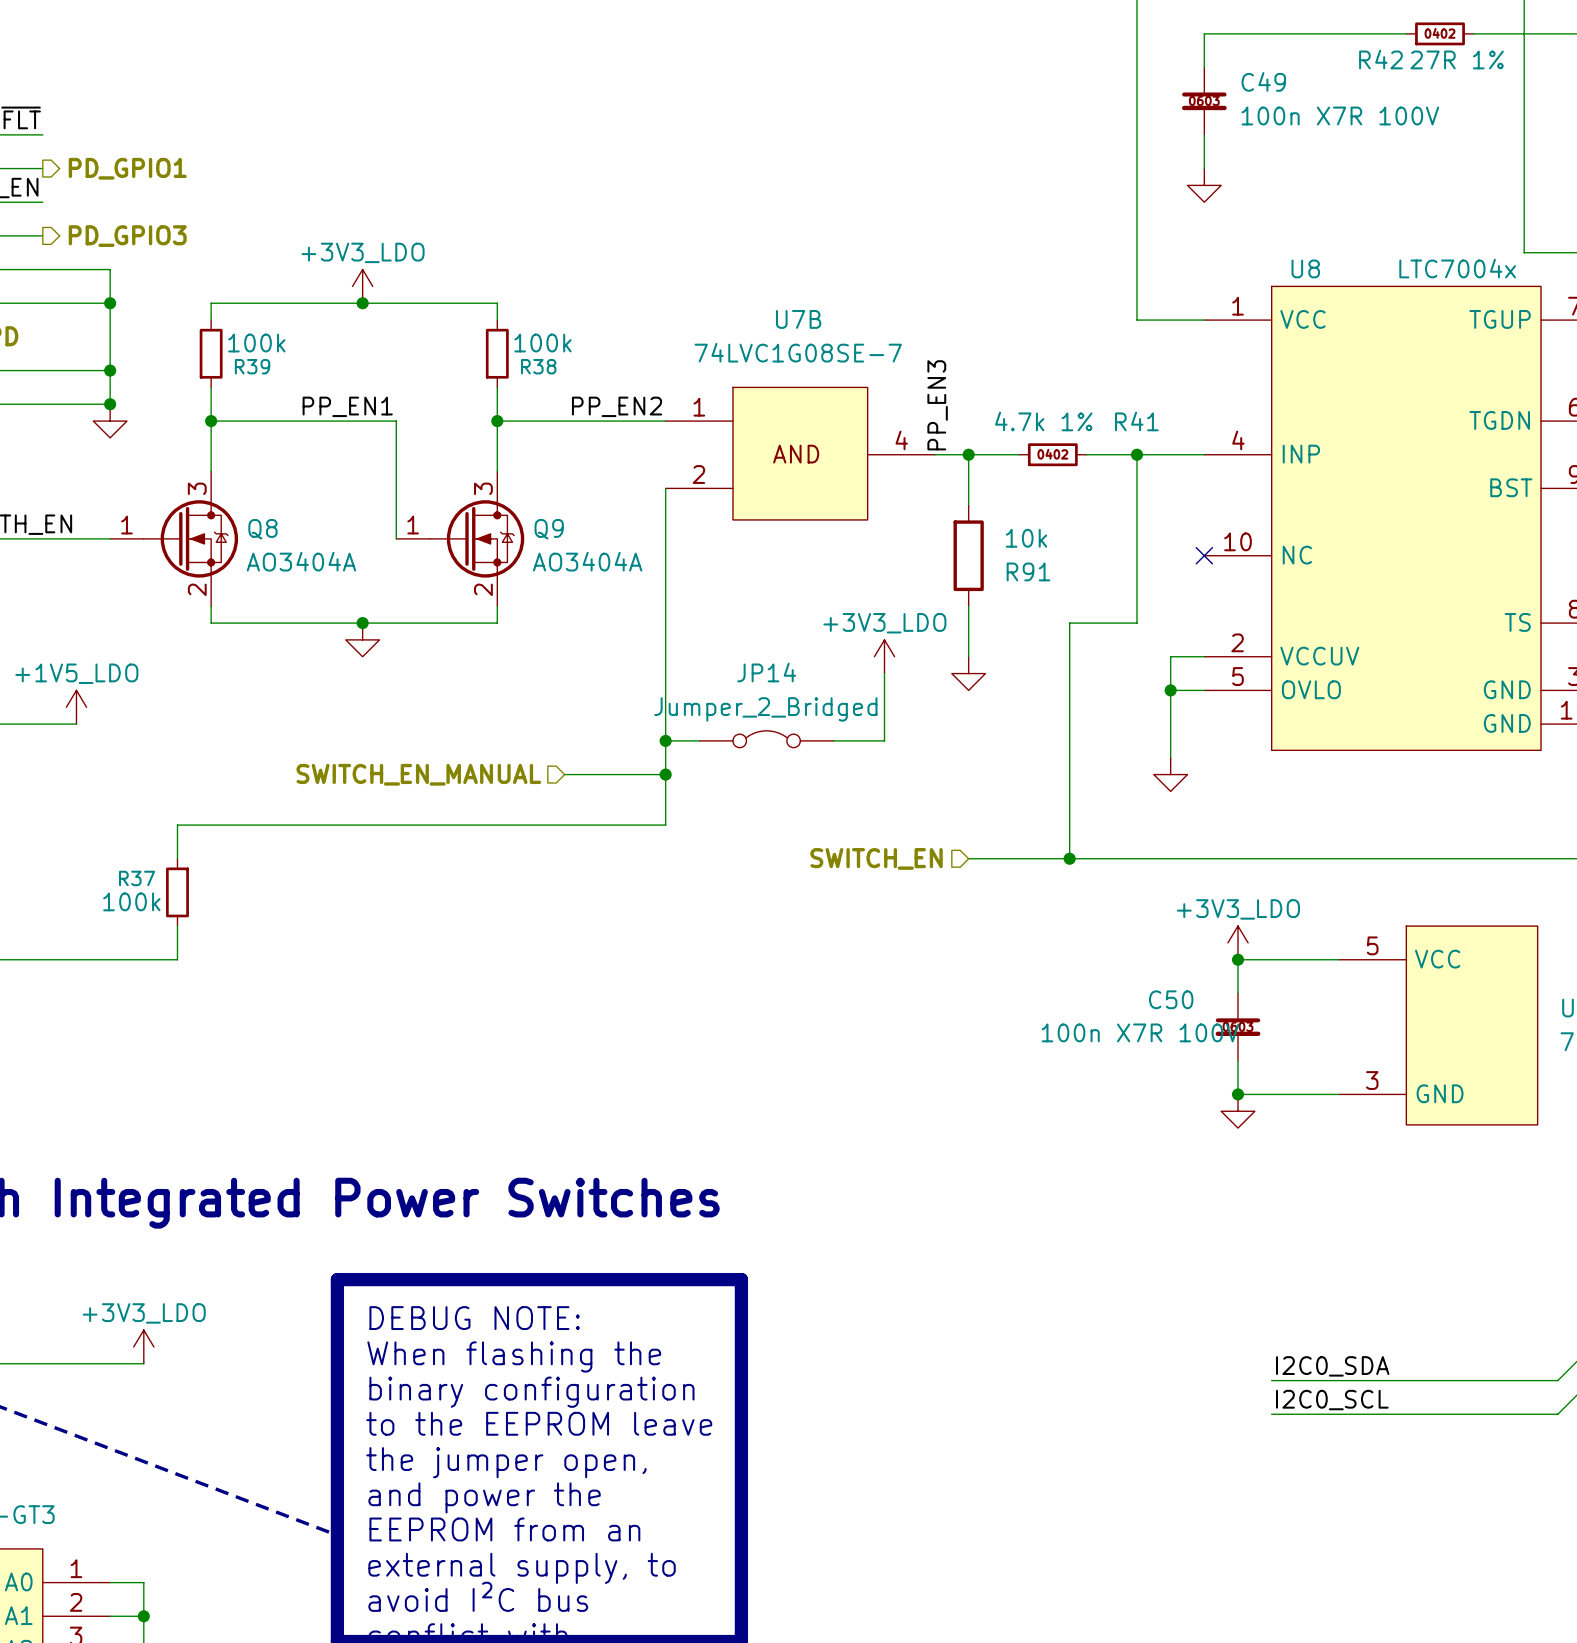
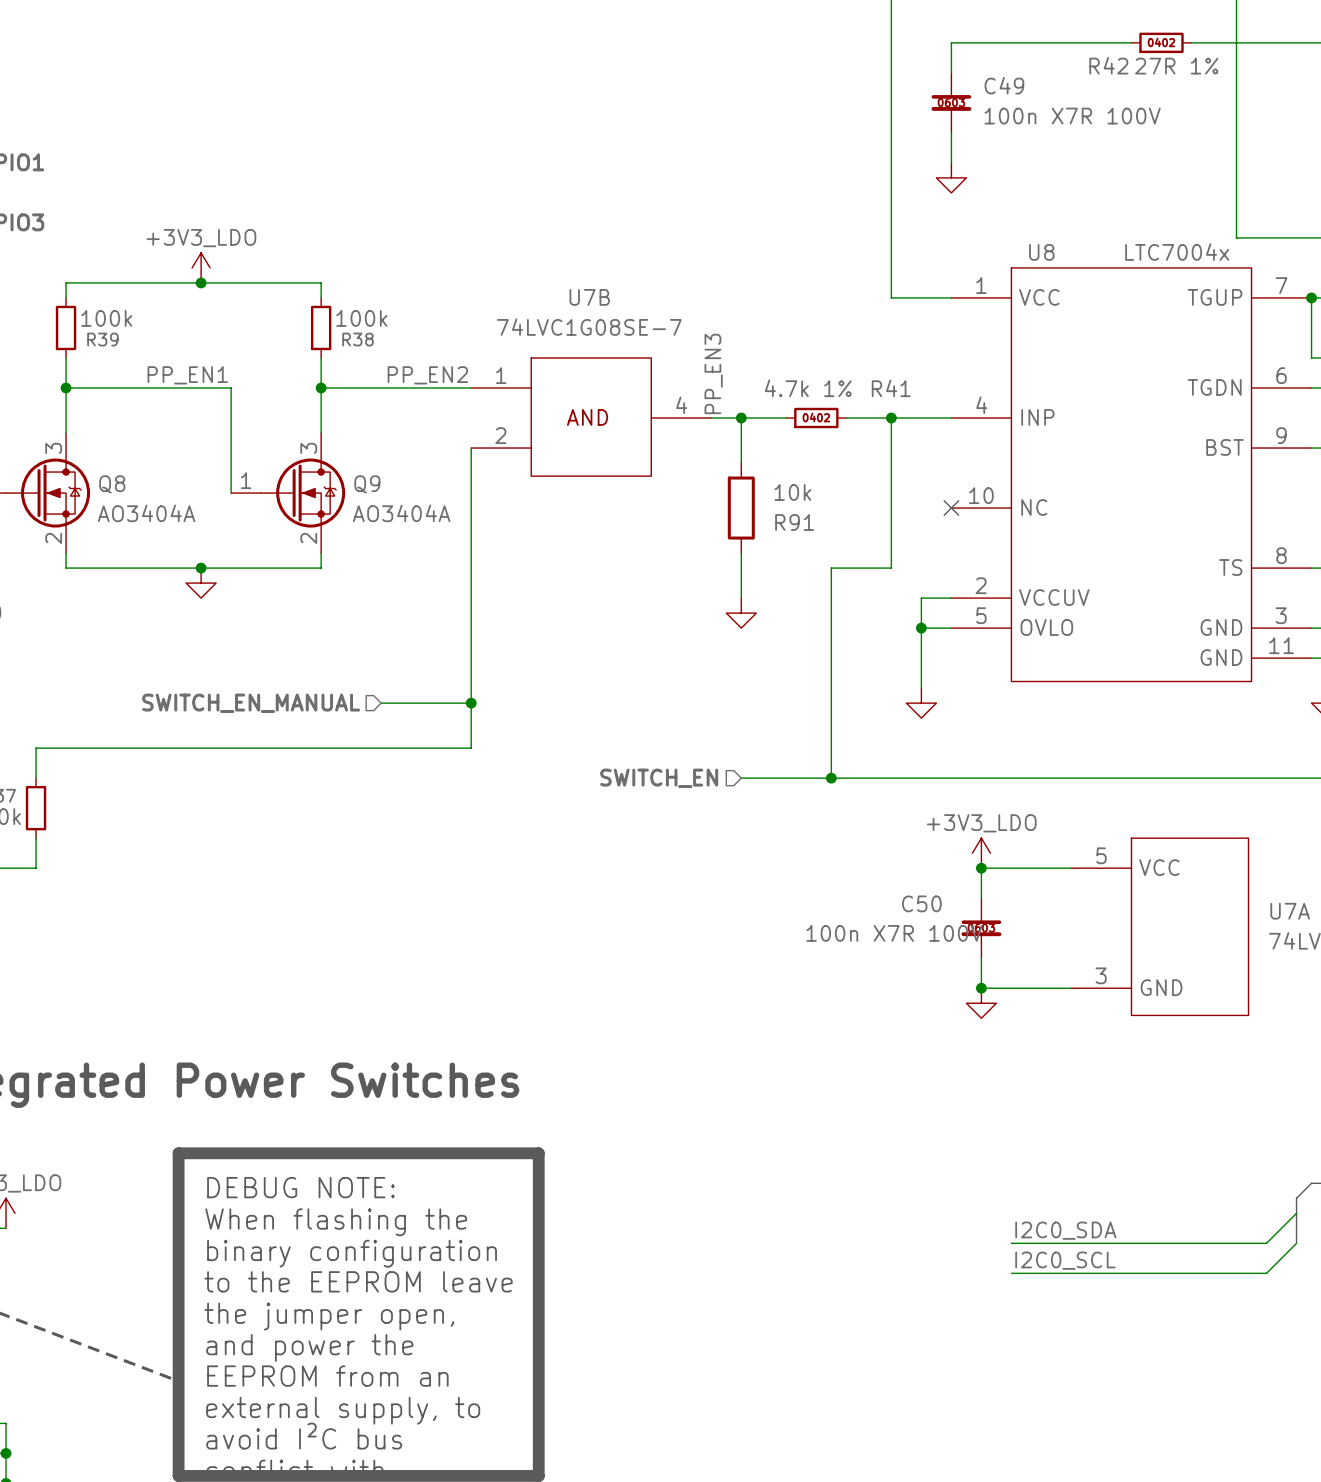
power symbol: +3V3_LDO (884, 656) -> none
wire: (884, 673) (884, 740) (833, 740) -> none
JP14: Jumper_2_Bridged (766, 739) -> none
wire: (665, 740) (699, 740) -> none
junction: (665, 740) -> none

